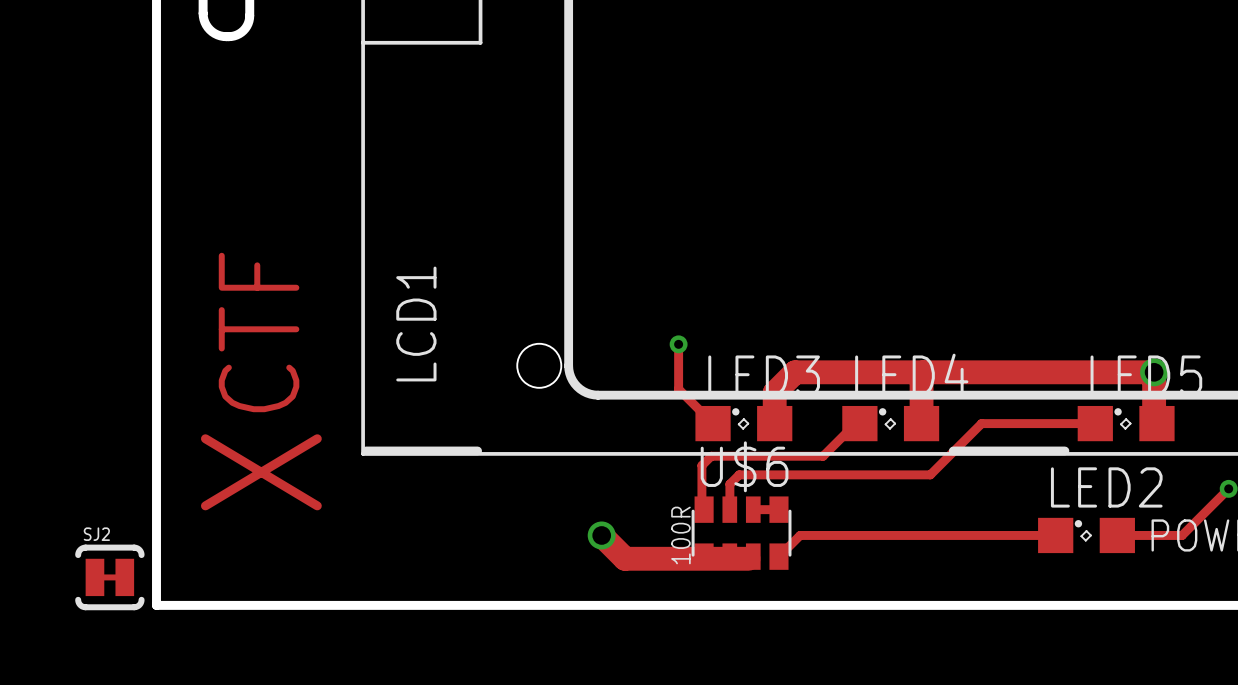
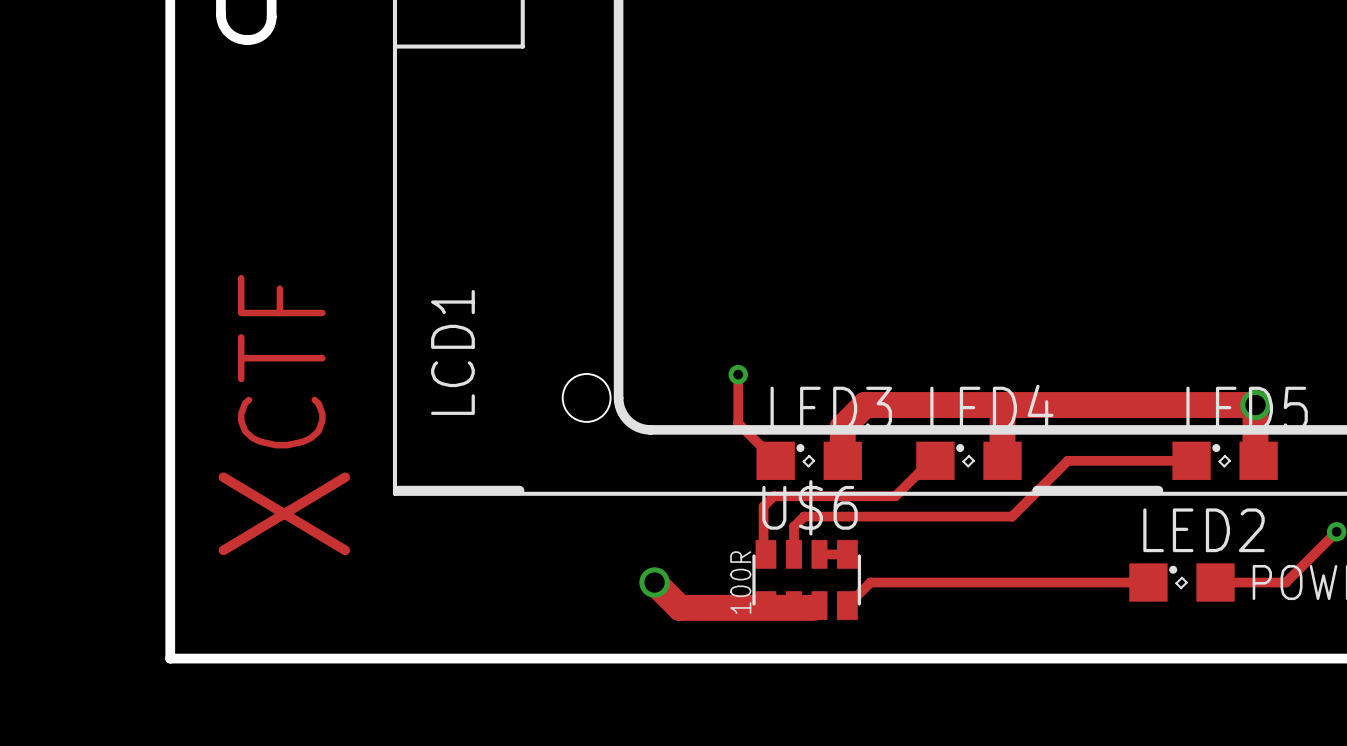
SJ2: (109, 577) -> none

